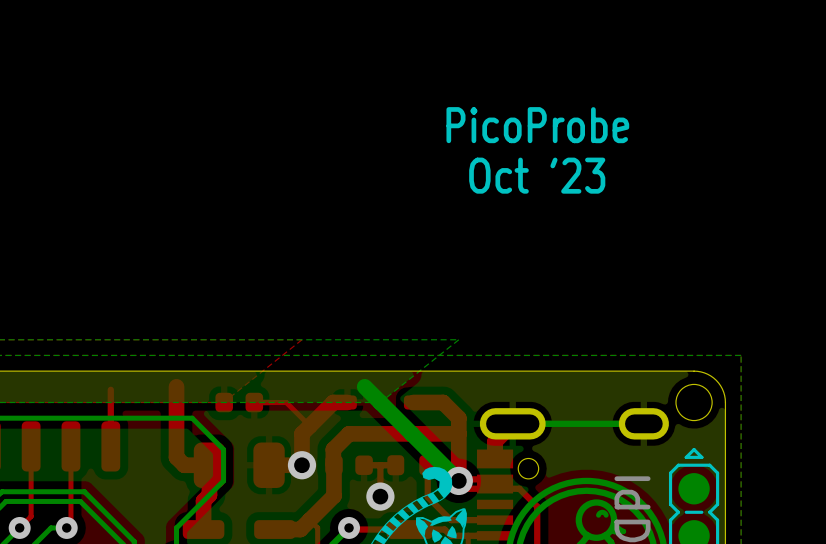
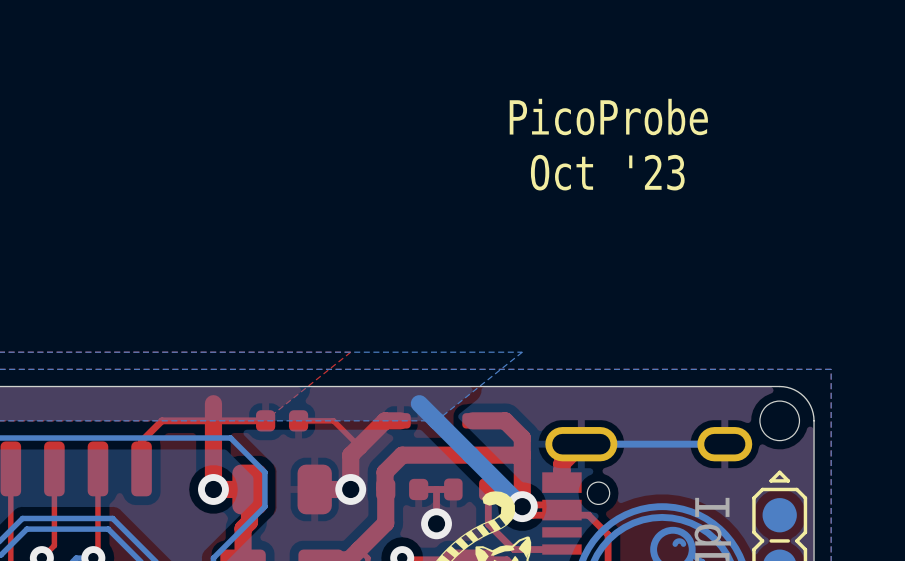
top track: (110, 389) (110, 421) -> (255, 420) (161, 420) (141, 441)
via: none -> (213, 489)

